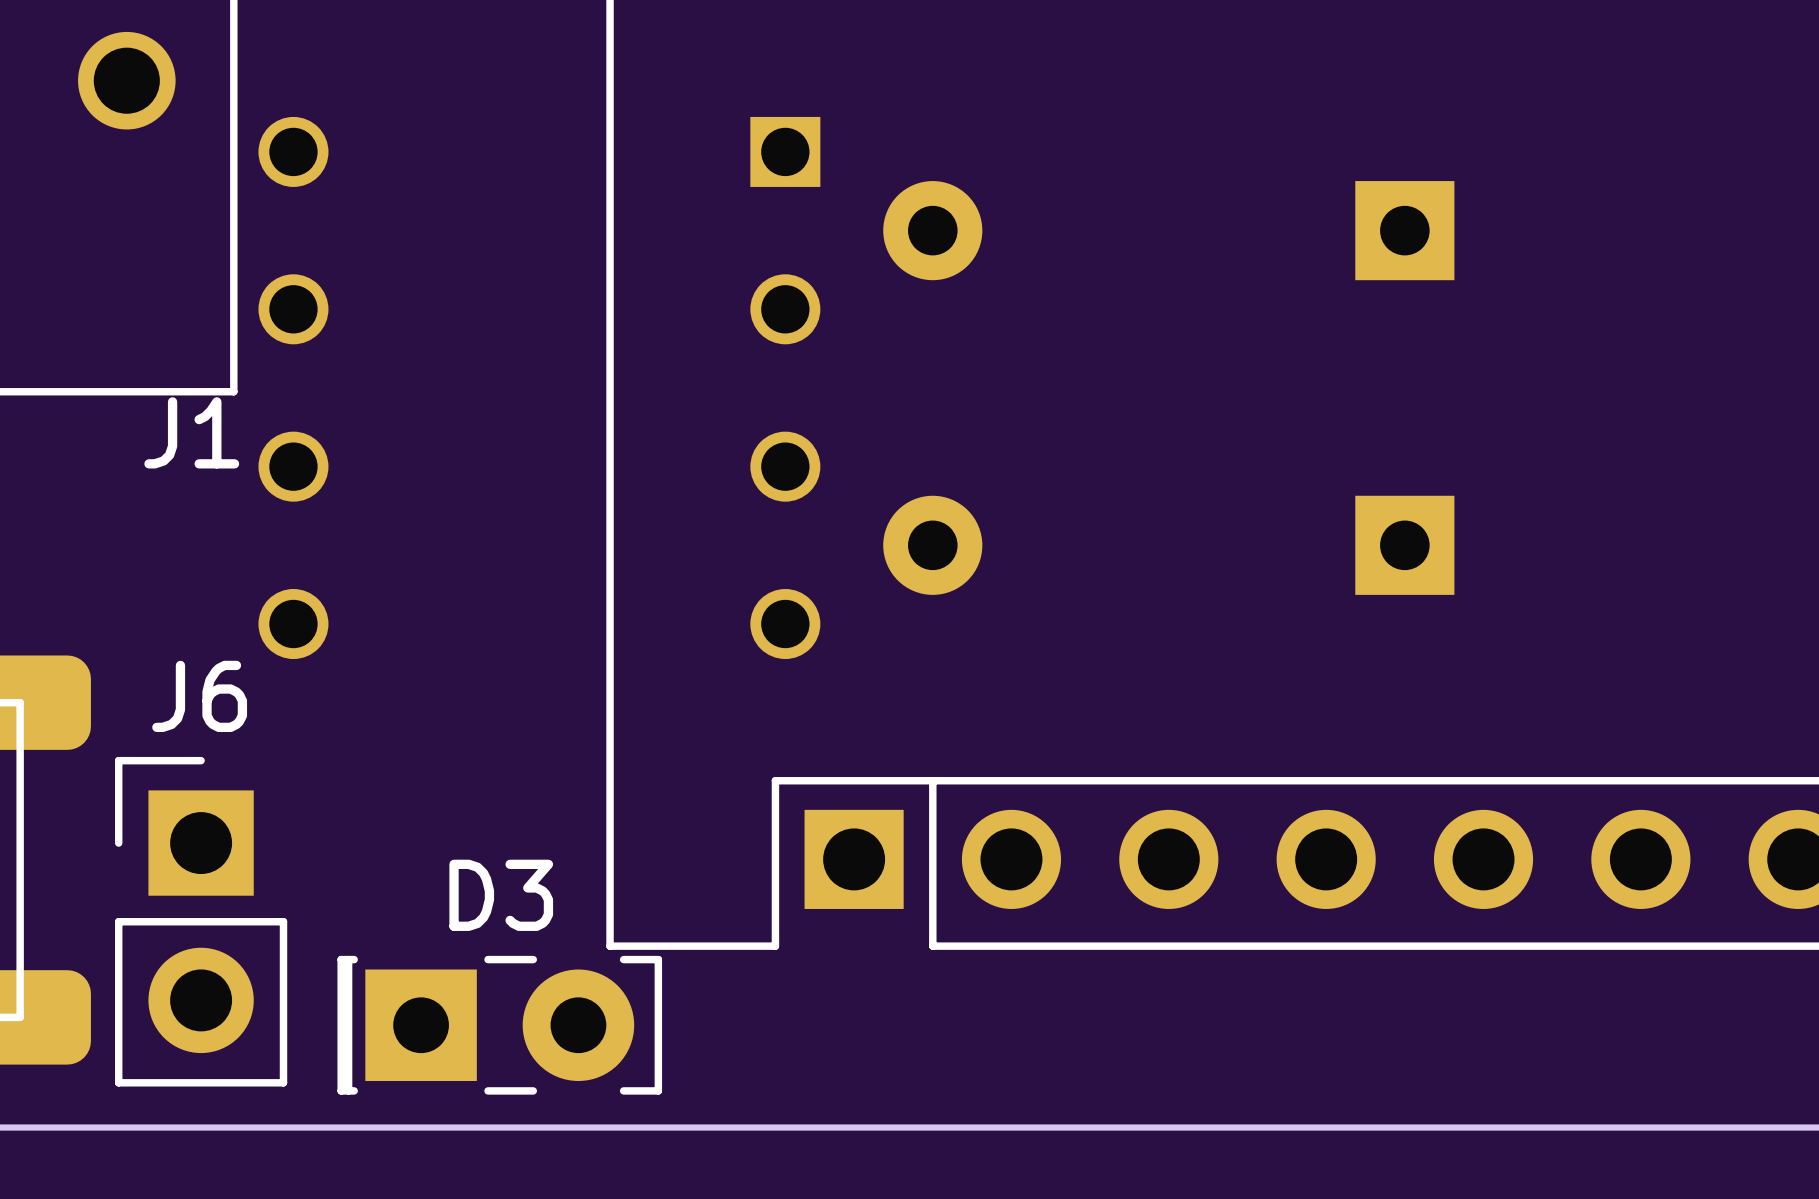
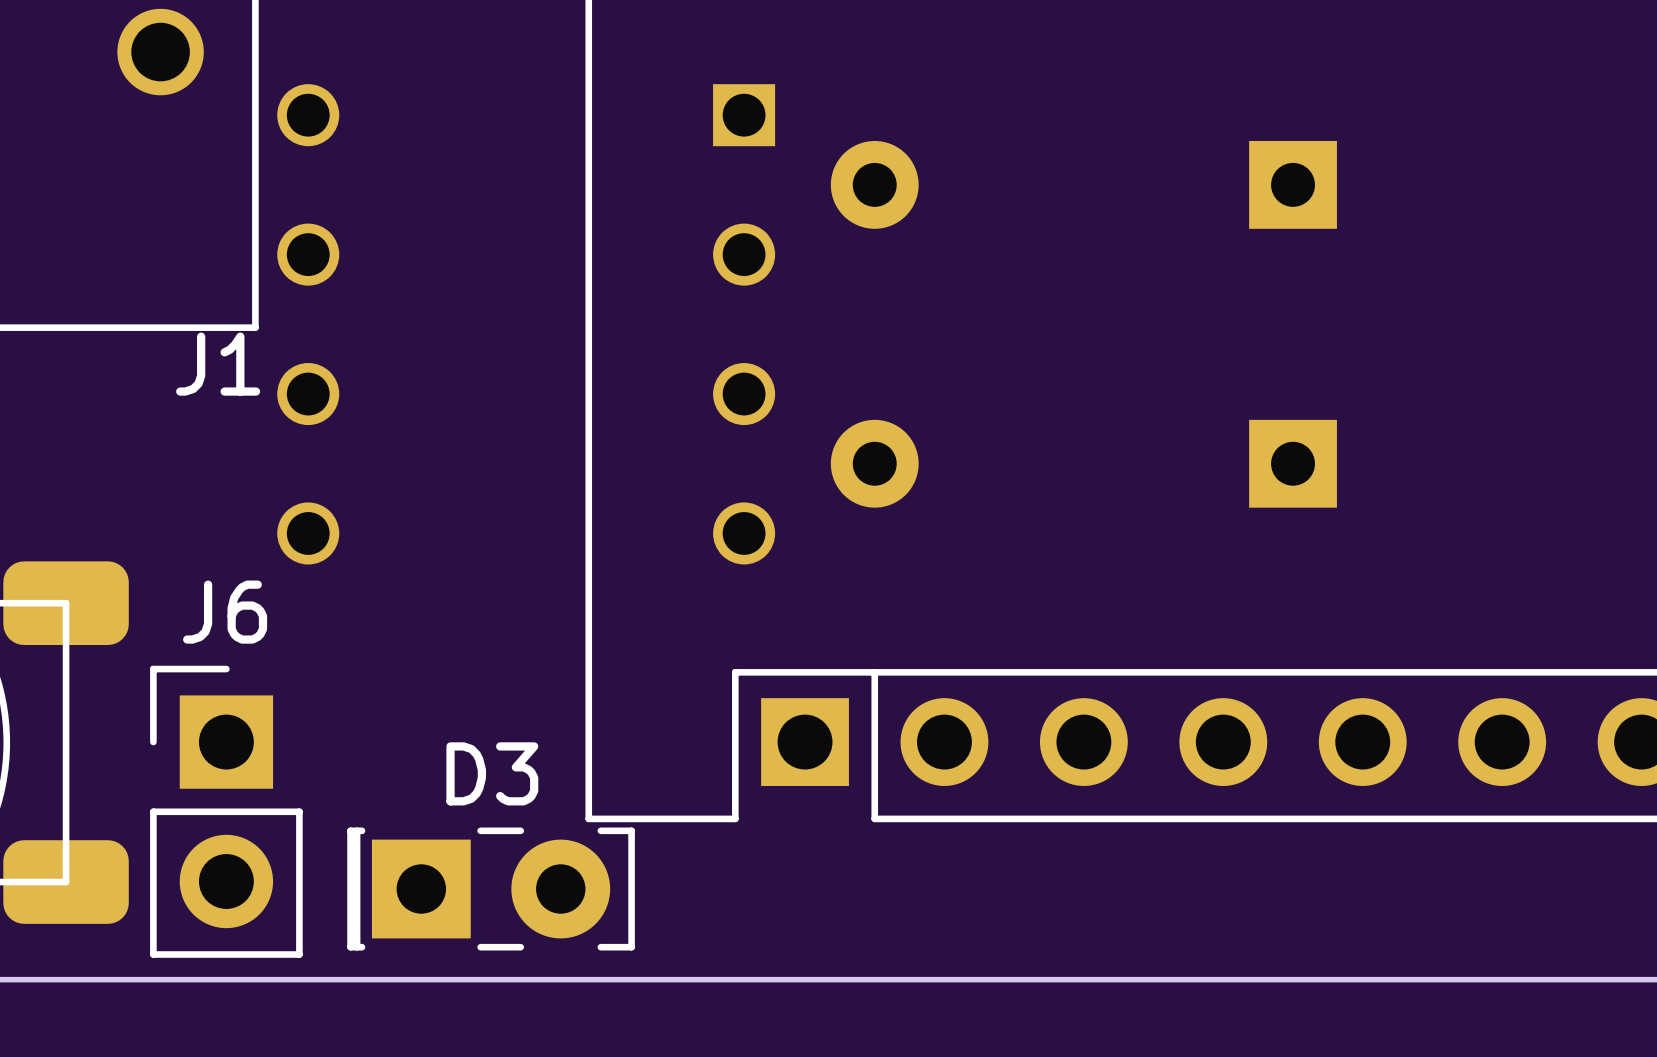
J6 position: (201, 921) -> (226, 811)

